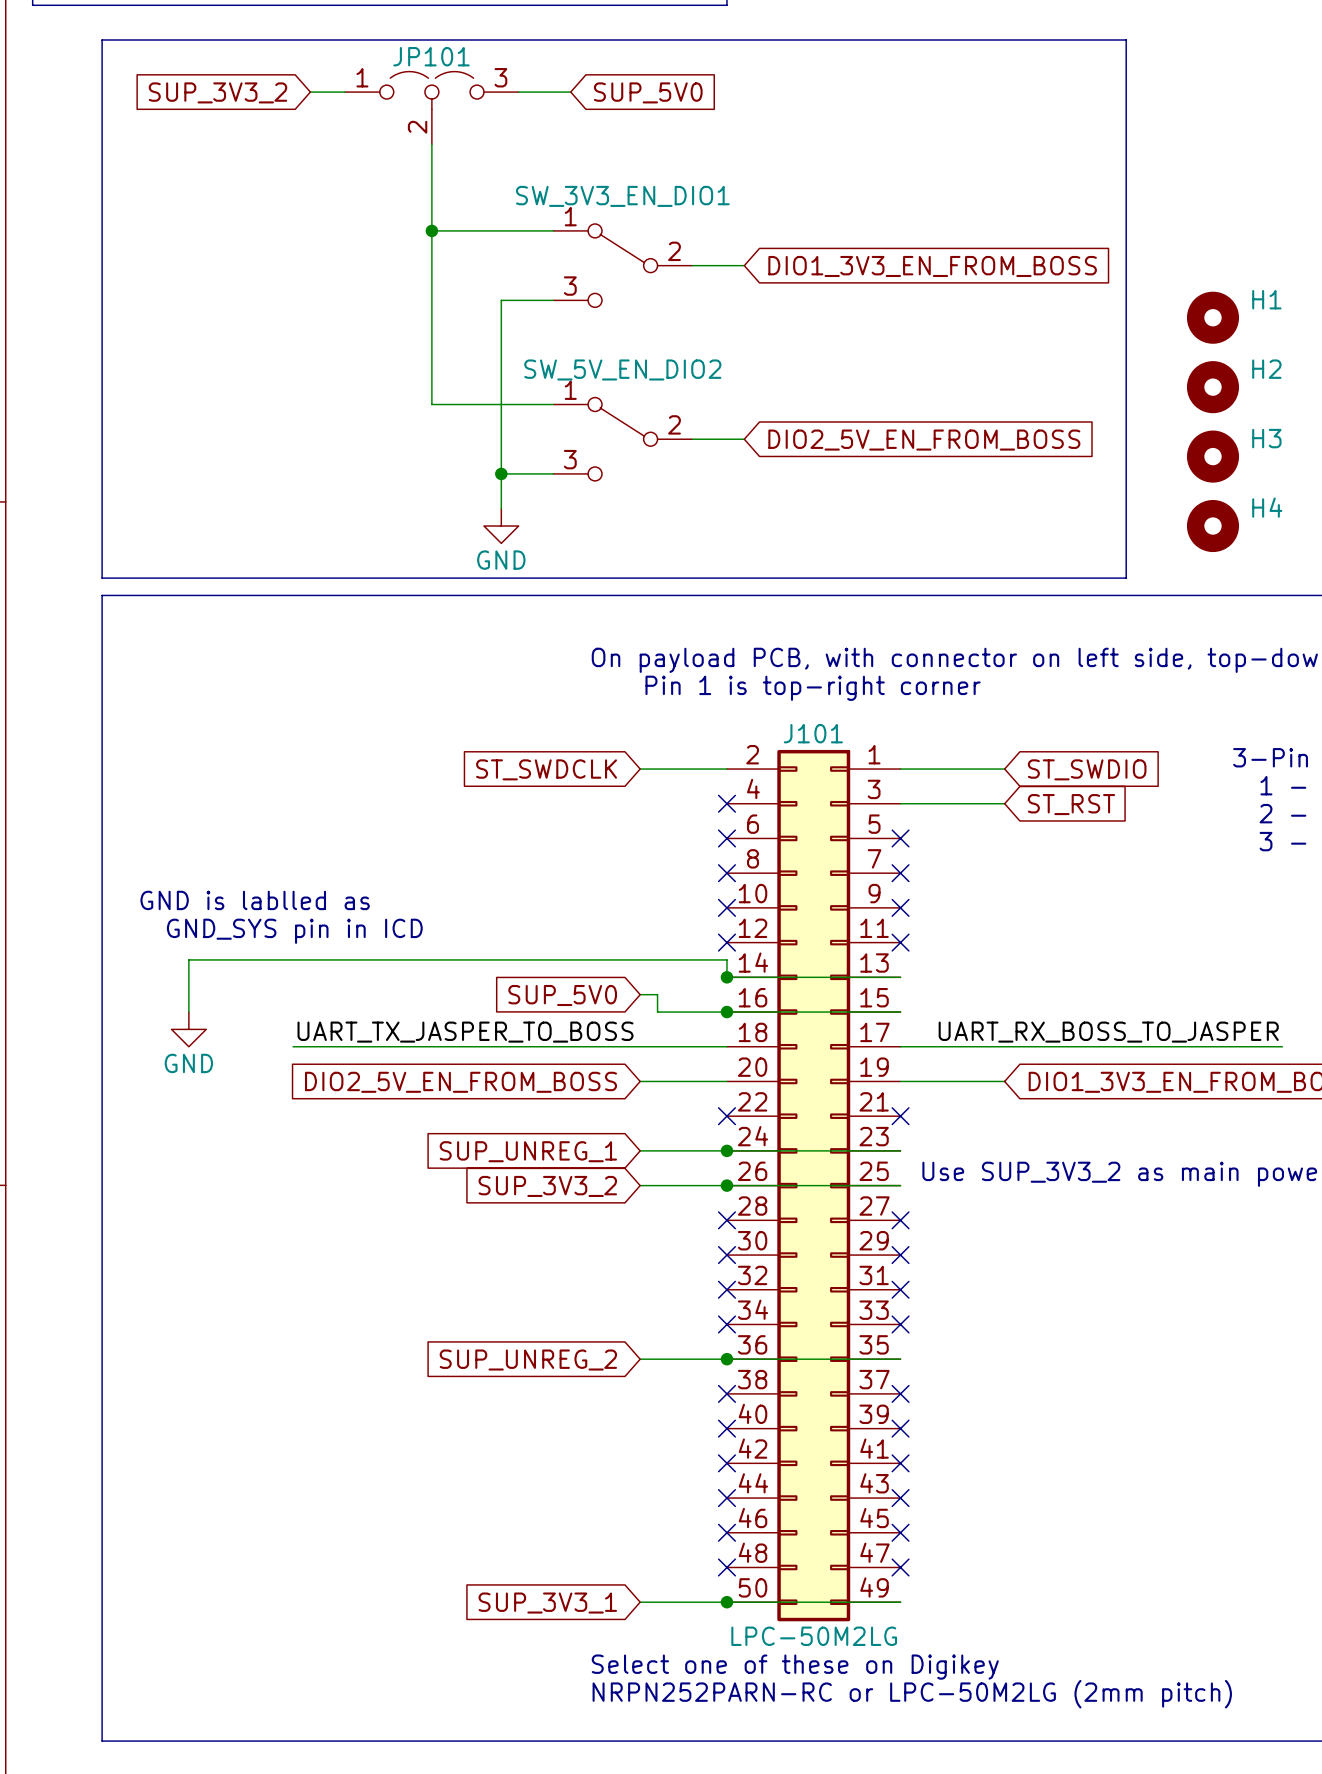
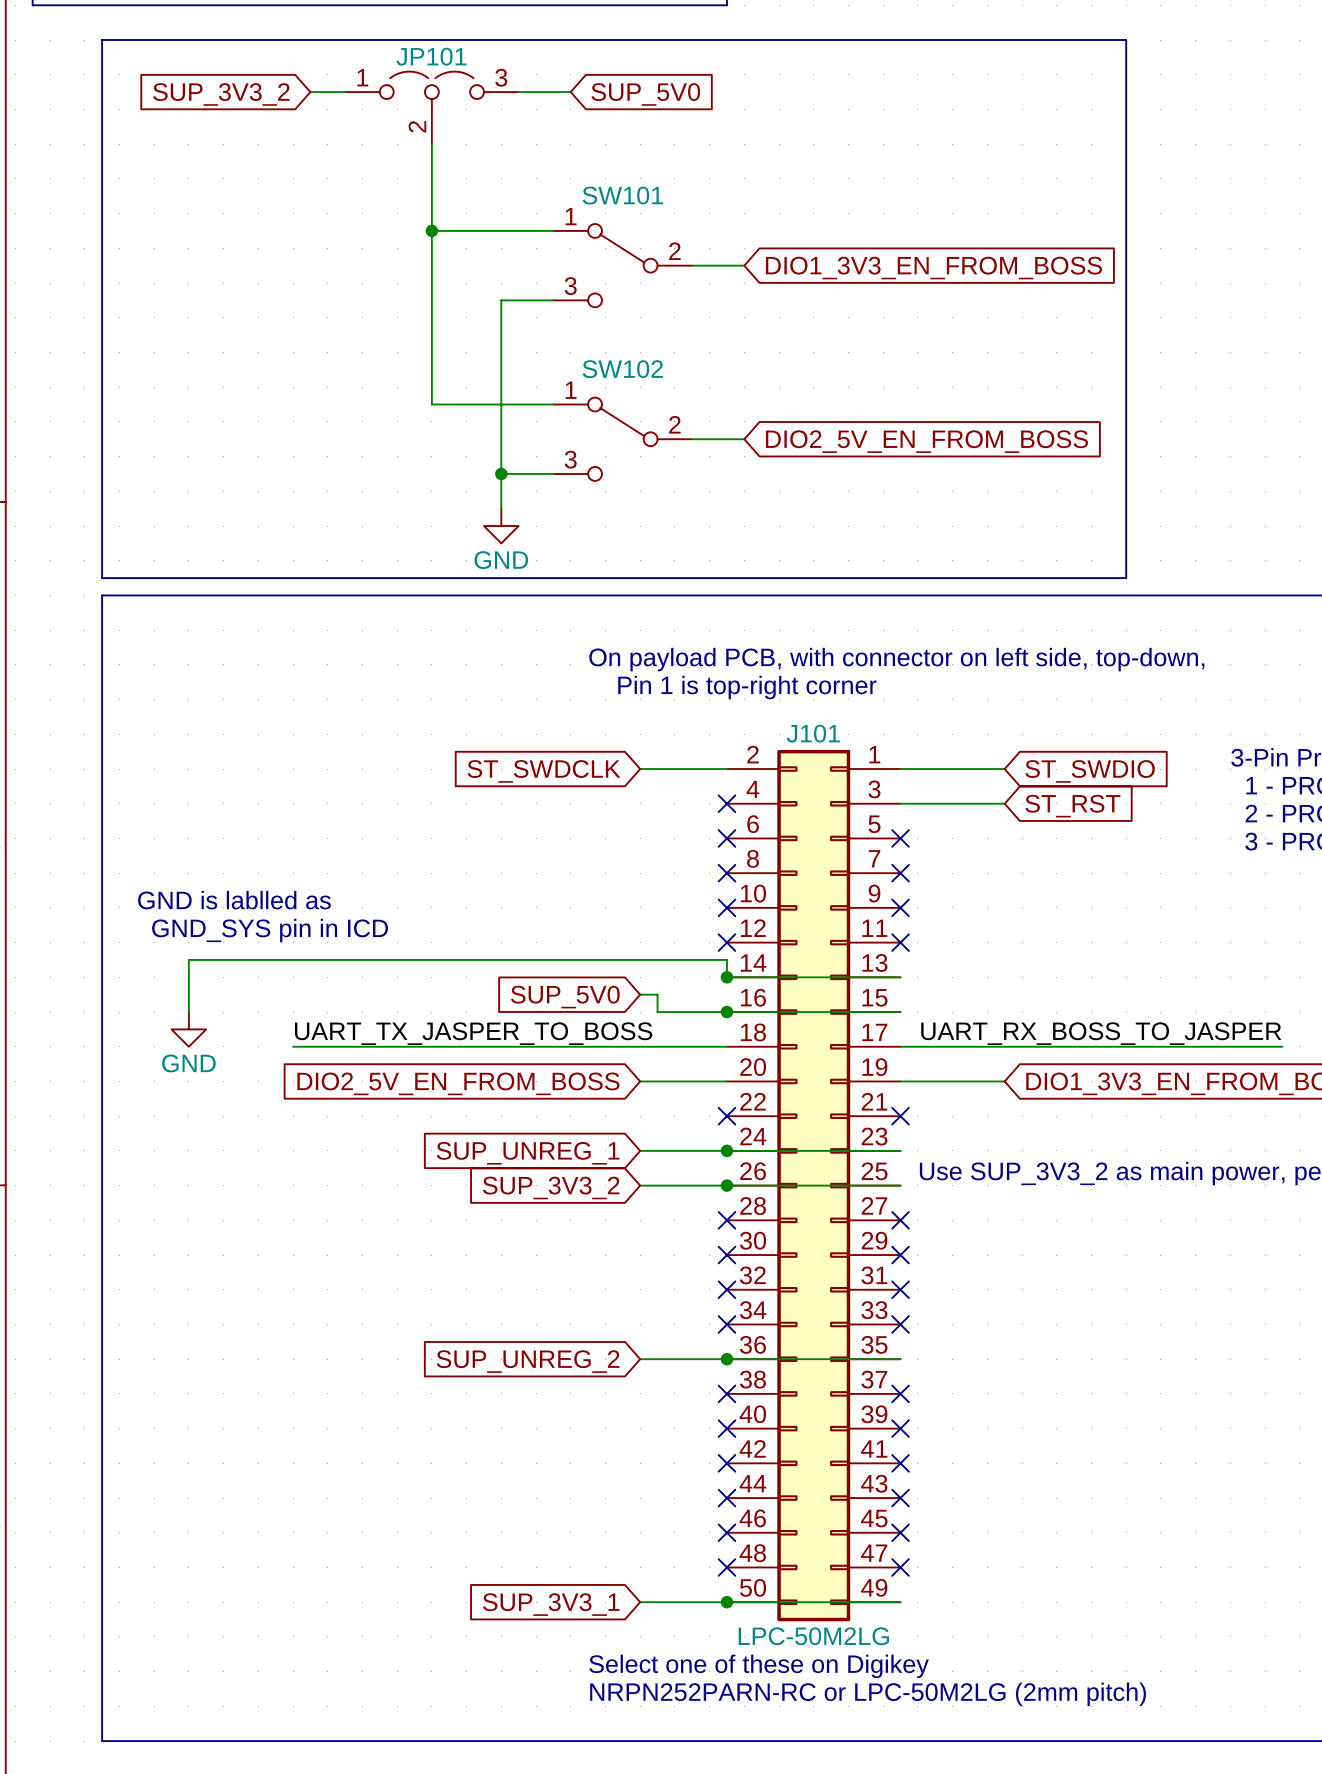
SW_3V3_EN_DIO1 name: SW_3V3_EN_DIO1 (622, 196) -> SW101 (622, 195)
H1: (1212, 317) -> none
SW_5V_EN_DIO2 name: SW_5V_EN_DIO2 (622, 369) -> SW102 (622, 369)
H2: (1212, 387) -> none
H3: (1212, 456) -> none
H4: (1212, 526) -> none

